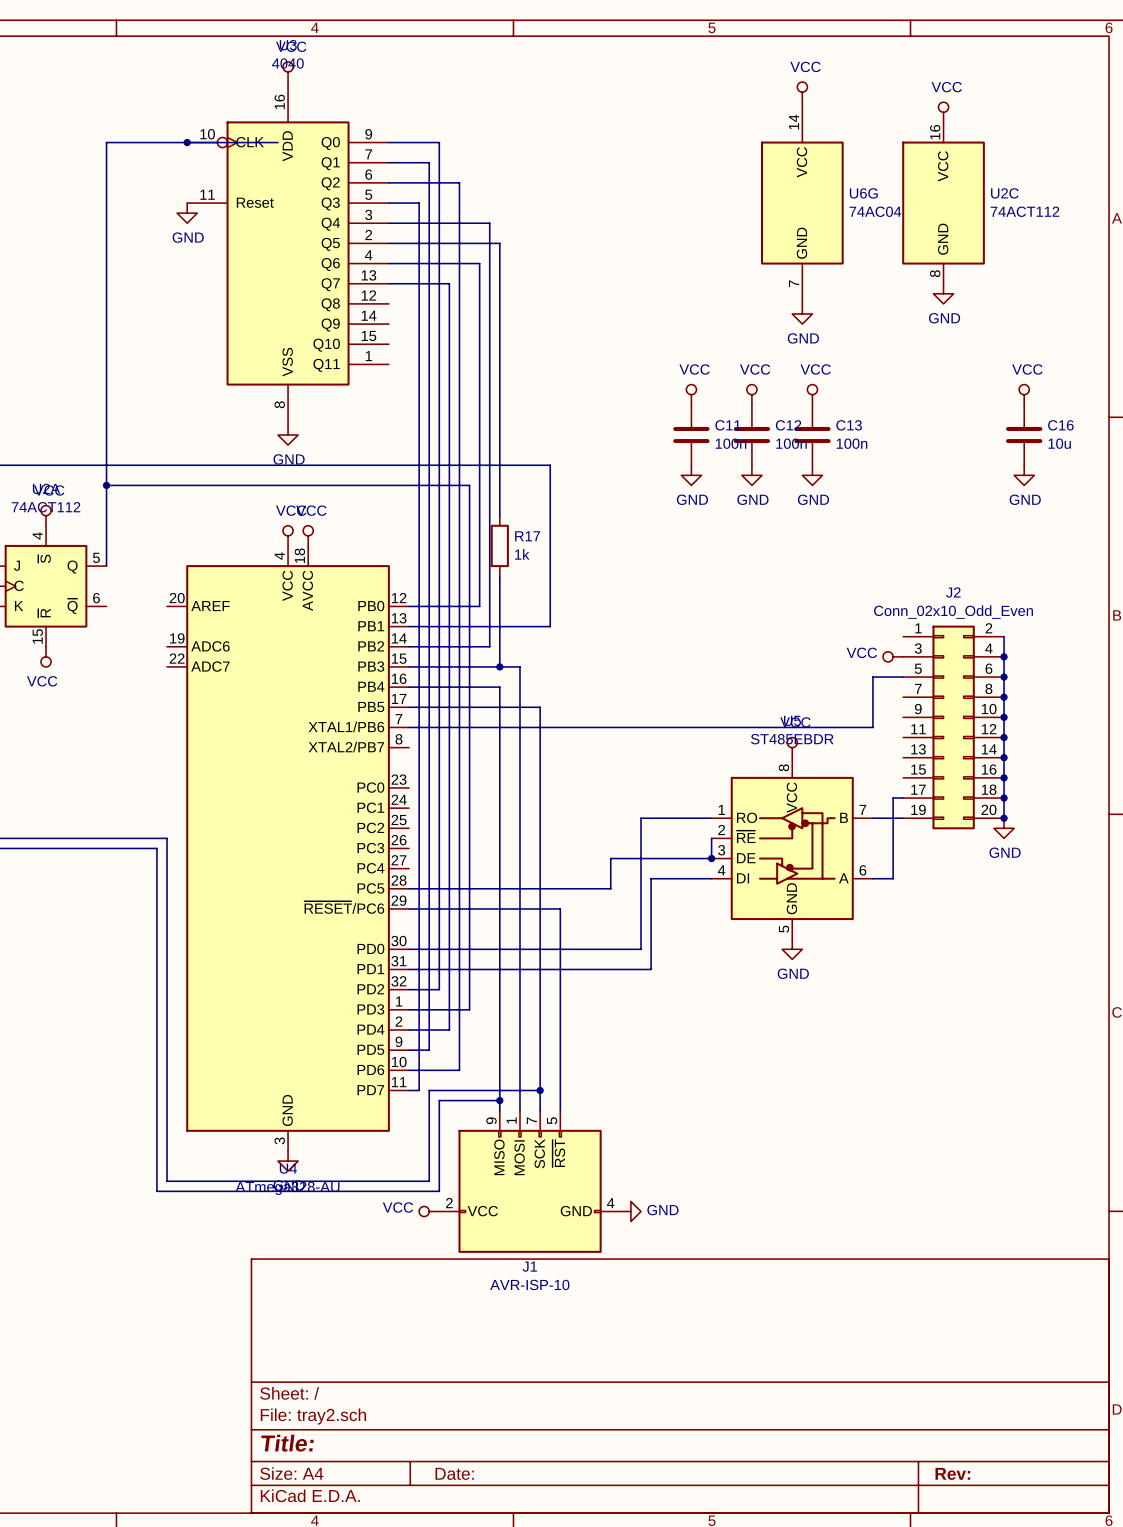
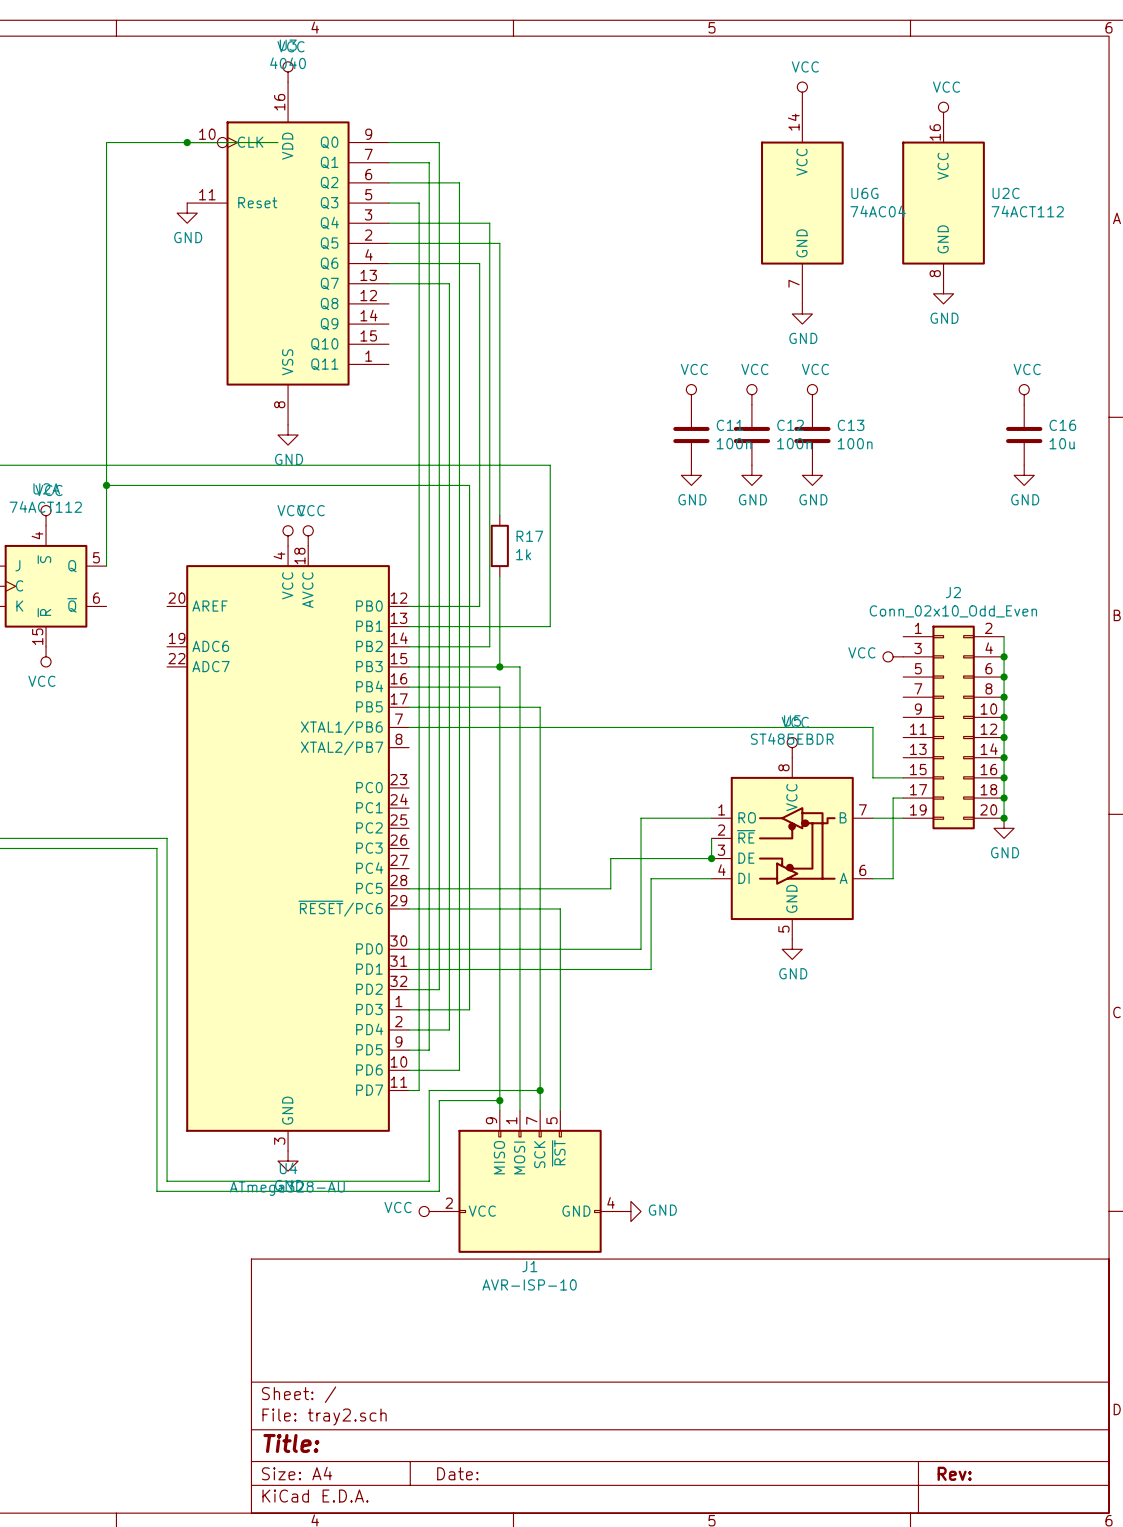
wire: (903, 677) (872, 677) (872, 727) -> (903, 777) (872, 777) (872, 727)

